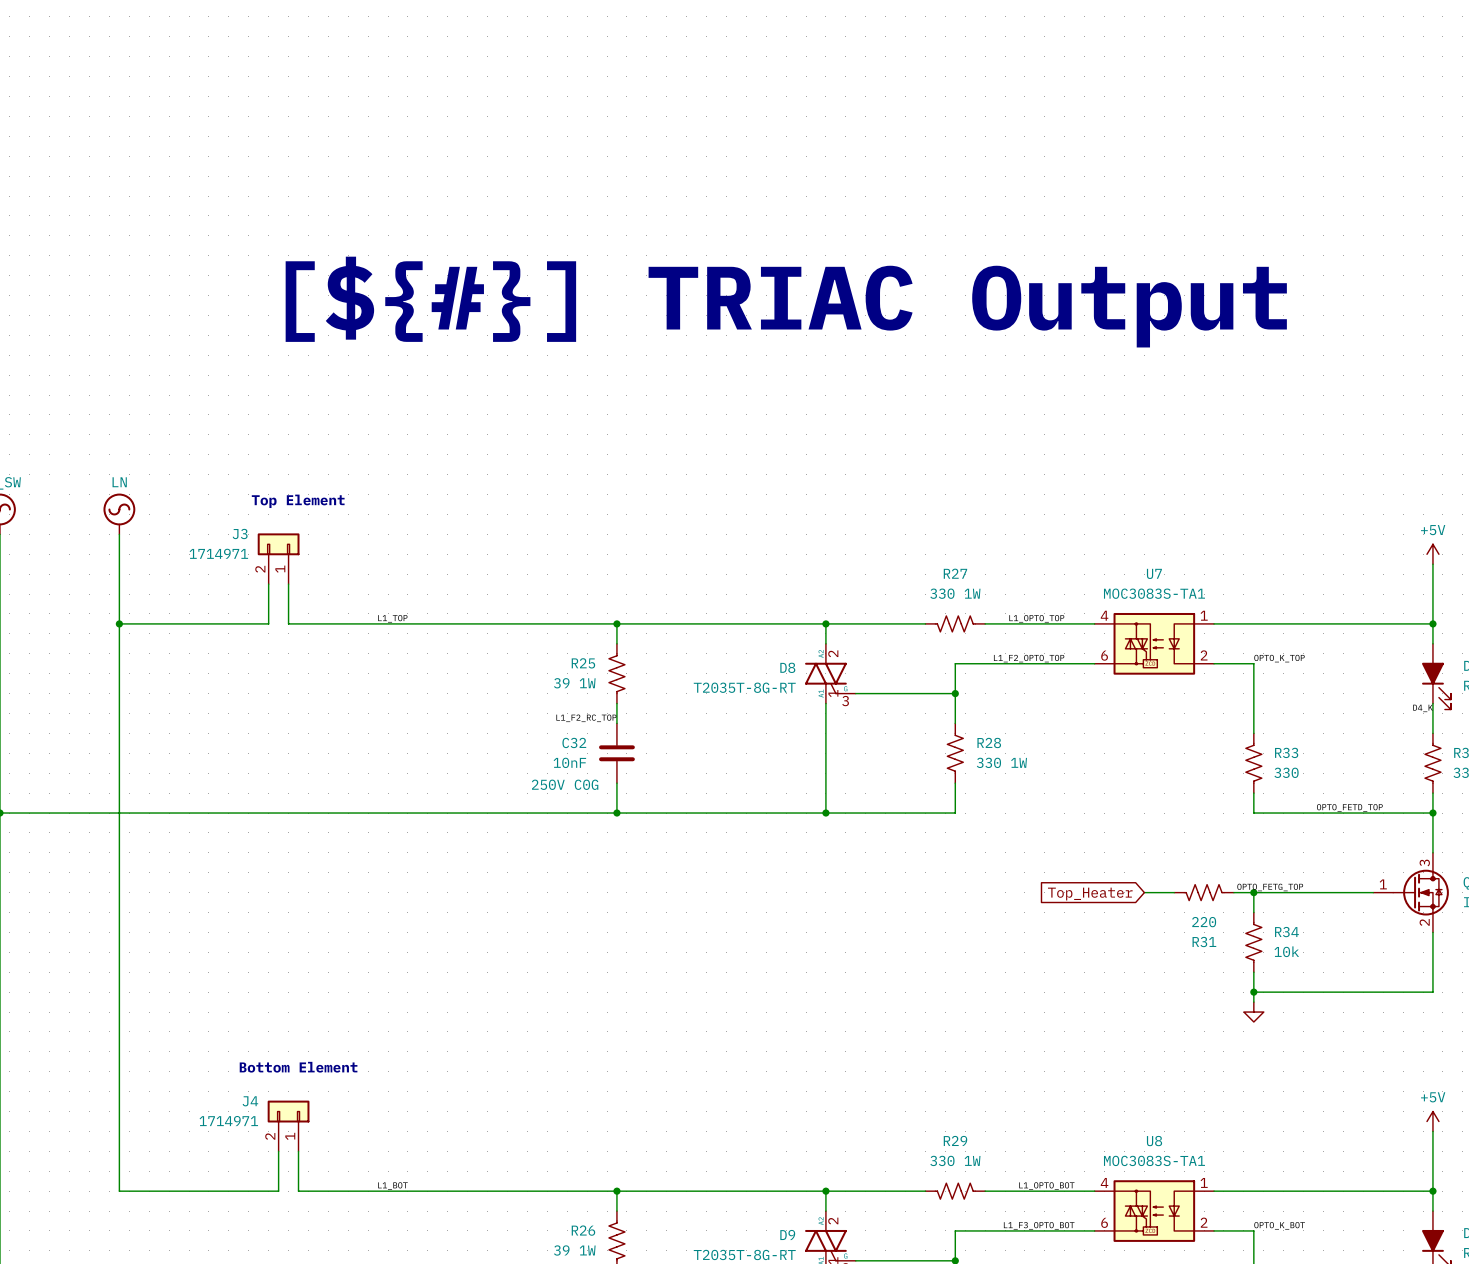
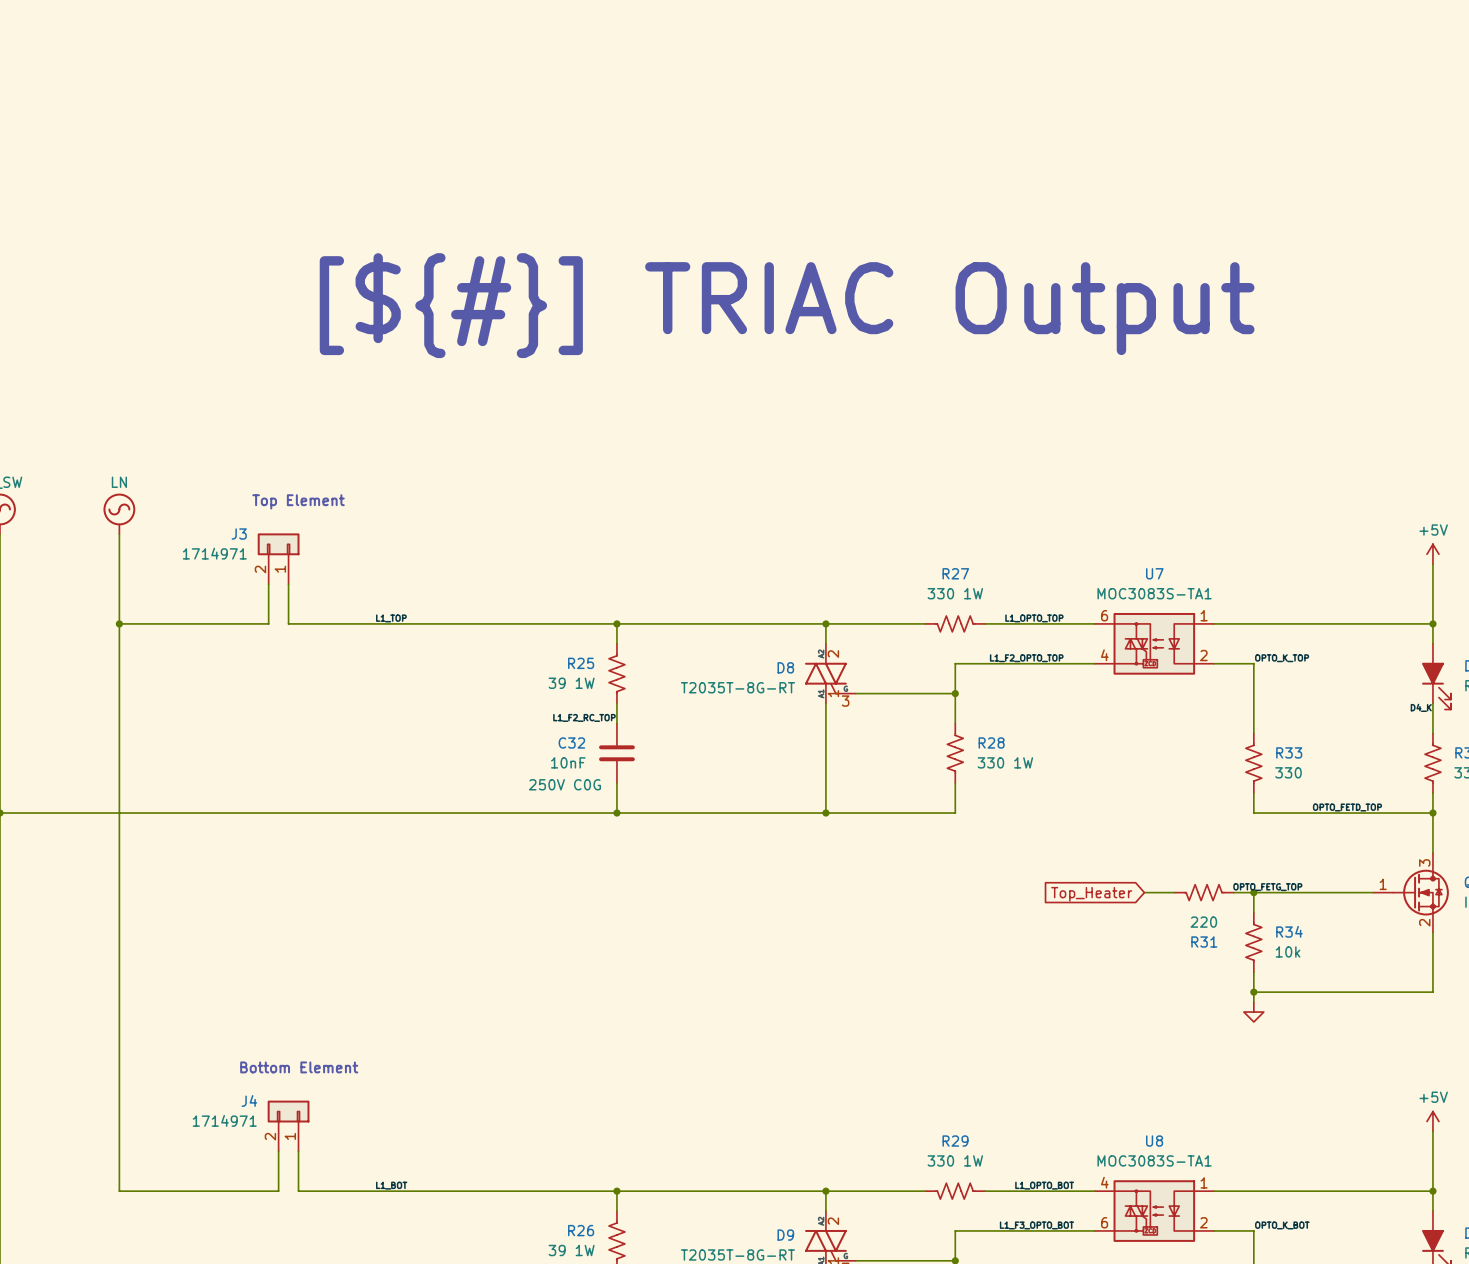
U7 pin number: 4 (1104, 615) -> 6 (1104, 615)
U7 pin number: 6 (1104, 655) -> 4 (1104, 655)

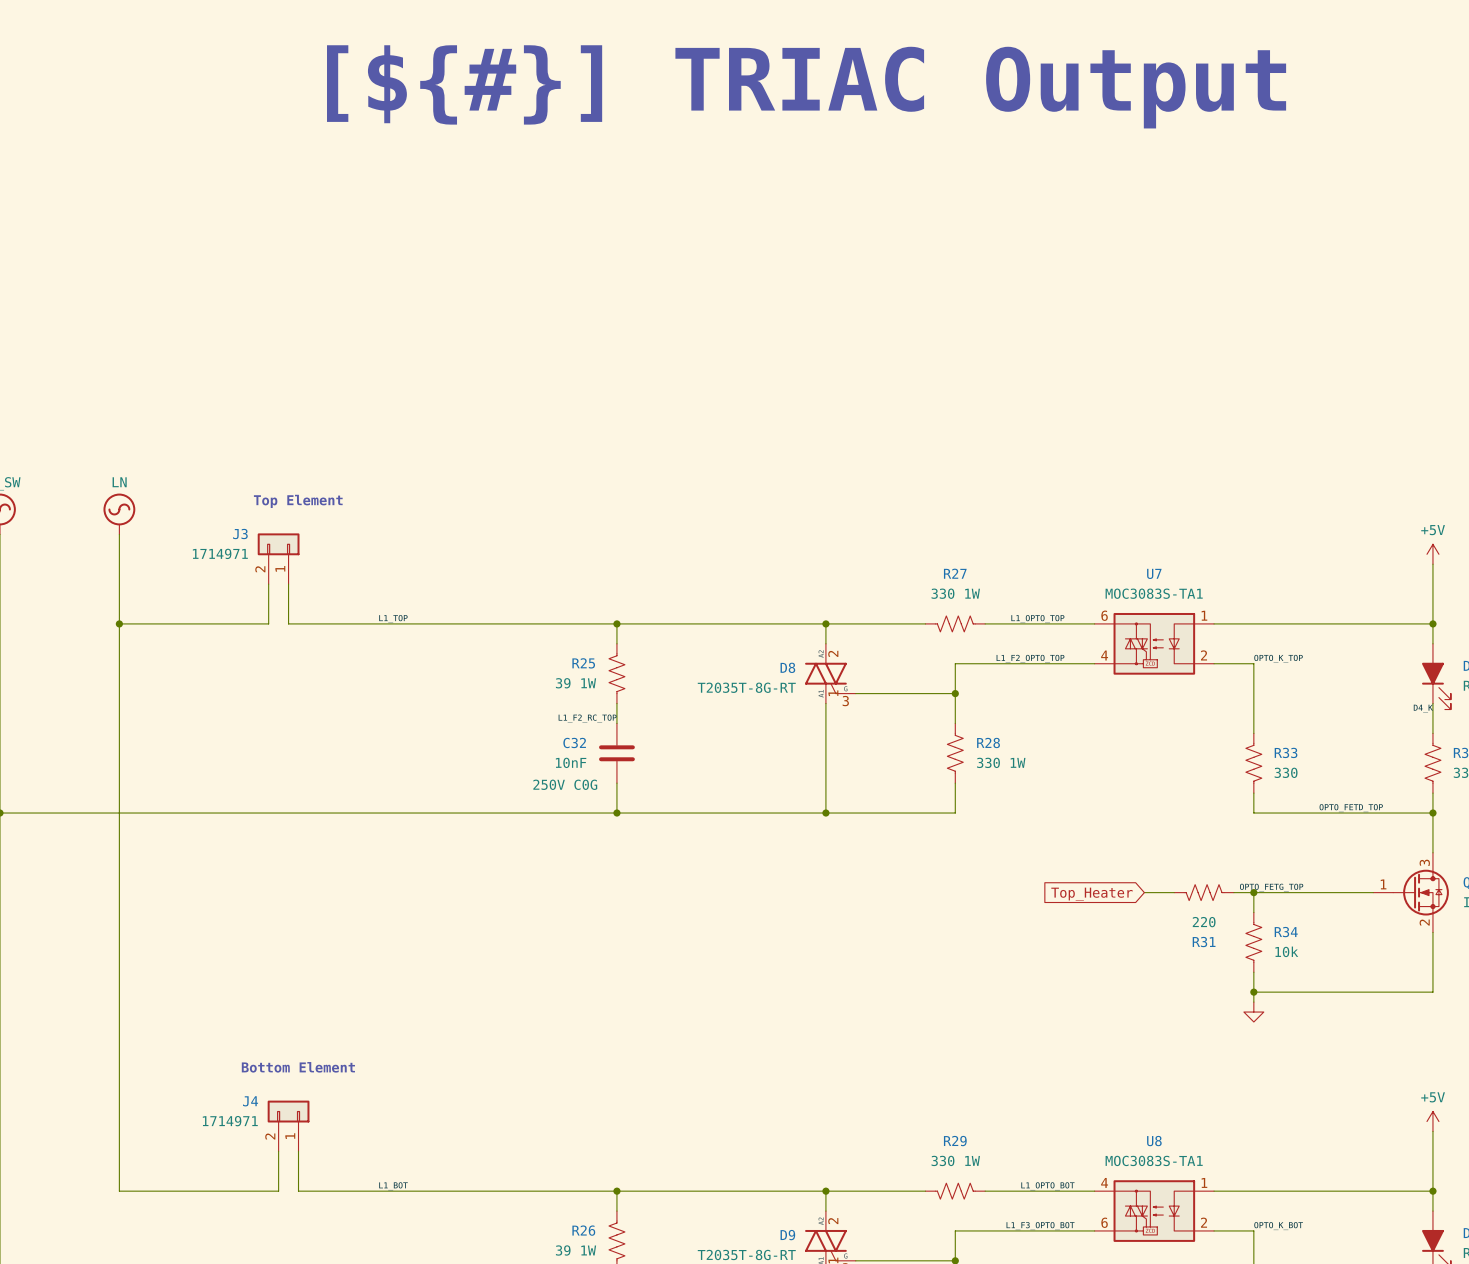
text: none -> [${#}] TRIAC Output (806, 86)
text: [${#}] TRIAC Output (787, 305) -> none

